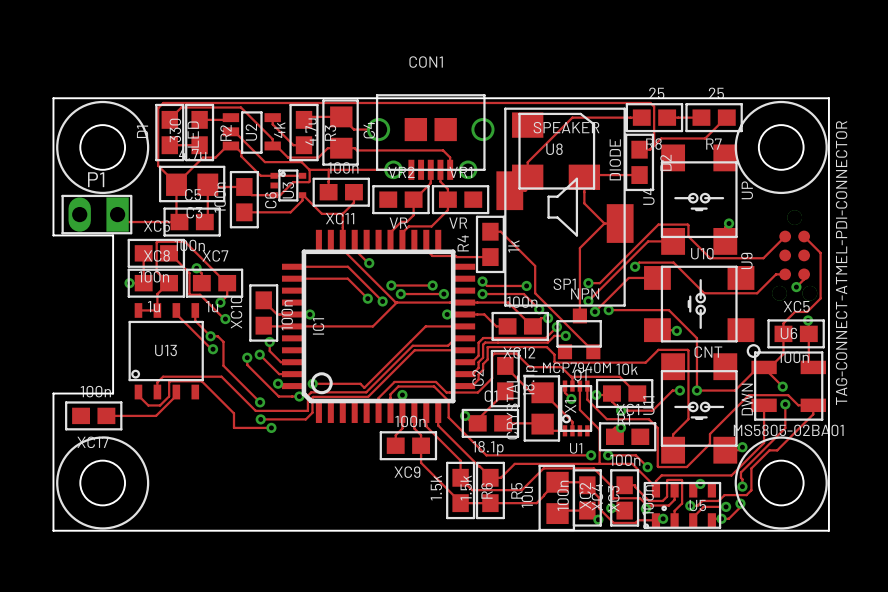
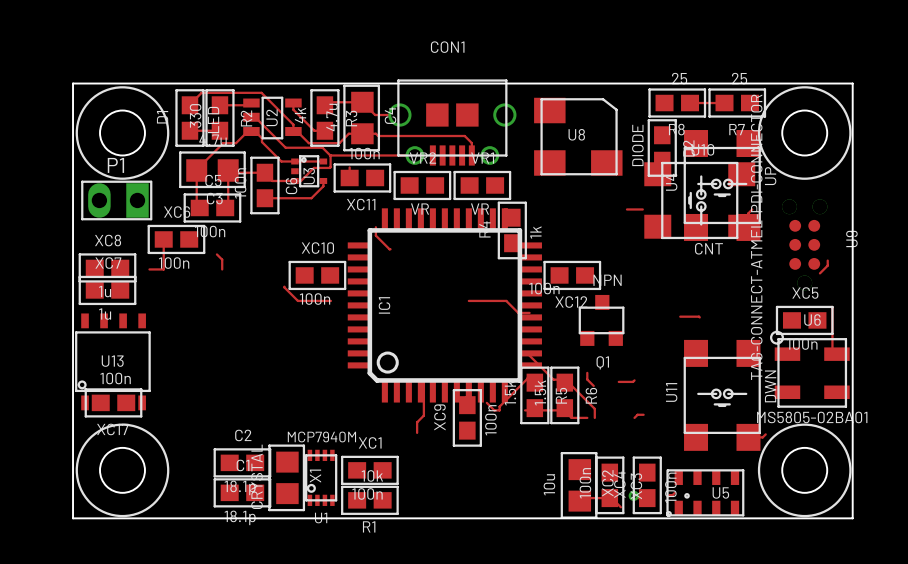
track: (641, 117) (572, 117) (527, 162) (527, 188) (525, 190) (509, 190) -> none
track: (726, 117) (705, 138) (661, 138) (650, 149) (639, 149) -> none
track: (654, 145) (654, 106) (650, 102) (163, 102) (158, 108) (158, 165) (176, 184) -> none
track: (328, 169) (328, 181) -> none
track: (430, 169) (430, 183) (413, 199) (413, 215) (406, 221) (401, 221) (390, 232) (390, 241) -> none
track: (440, 169) (440, 181) (447, 189) (447, 210) (431, 226) (408, 226) (402, 232) (402, 241) -> none
track: (639, 175) (586, 175) (584, 177) (584, 203) (604, 223) (579, 248) (579, 315) -> none
track: (353, 192) (353, 202) (342, 213) -> none
track: (302, 195) (321, 213) (342, 213) -> none
SP1: SPEAKER (564, 207) -> none
track: (342, 213) (342, 249) (395, 302) (508, 302) (532, 326) (541, 318) (548, 318) -> none
track: (117, 214) (125, 222) (179, 222) -> none
via: (729, 223) -> none
track: (490, 232) (500, 231) (535, 265) (535, 293) (593, 351) -> none
board edge: (53, 235) (113, 235) (113, 393) (53, 393) -> (73, 221) (73, 380)
track: (785, 236) (763, 258) (710, 258) (688, 236) (687, 224) (658, 224) (599, 283) (588, 283) -> none
track: (804, 236) (820, 252) (820, 298) (807, 311) (794, 311) (783, 323) (783, 354) (770, 367) (758, 367) (735, 390) (696, 390) (696, 338) (668, 310) (608, 310) -> none
track: (426, 241) (426, 249) (432, 255) (490, 257) -> none
track: (673, 241) (648, 241) (588, 301) -> none
track: (169, 253) (189, 273) (189, 294) (200, 294) (225, 319) -> none
U9 rotation: 0° (794, 255) -> 180° (804, 244)
via: (369, 263) -> none
track: (293, 266) (347, 266) (382, 301) -> none
track: (635, 266) (639, 262) (673, 262) (704, 293) (757, 293) (776, 274) (785, 274) -> none
via: (635, 266) -> none
via: (196, 268) -> none
track: (657, 277) (628, 277) (594, 311) -> none
track: (293, 278) (347, 278) (367, 298) -> none
track: (482, 281) (486, 285) (526, 285) -> none
via: (482, 281) -> none
via: (129, 283) -> none
XC8 position: (156, 283) -> (107, 267)
track: (168, 283) (156, 271) (156, 242) (185, 241) (227, 283) (227, 295) (220, 302) -> none
track: (168, 283) (157, 294) (157, 310) (138, 310) -> none
XC7 position: (214, 283) -> (107, 290)
via: (588, 283) -> none
track: (391, 285) (432, 285) -> none
via: (391, 285) -> none
via: (432, 285) -> none
via: (526, 285) -> none
via: (796, 287) -> none
track: (400, 294) (443, 294) -> none
via: (400, 294) -> none
via: (443, 294) -> none
track: (482, 294) (523, 294) (539, 309) -> none
via: (482, 294) -> none
via: (367, 298) -> none
via: (382, 301) -> none
via: (588, 301) -> none
via: (220, 302) -> none
track: (396, 302) (372, 326) (263, 325) -> none
U10 position: (699, 304) -> (699, 200)
via: (539, 309) -> none
track: (176, 310) (176, 314) (213, 349) -> none
track: (195, 310) (195, 320) (210, 336) (217, 336) (223, 341) (223, 365) (260, 402) -> none
via: (608, 310) -> none
via: (594, 311) -> none
XC10 rotation: 0° (263, 313) -> 90° clockwise (317, 275)
XC10 position: (263, 313) -> (317, 275)
via: (309, 314) -> none
via: (447, 314) -> none
via: (548, 318) -> none
via: (225, 319) -> none
via: (808, 320) -> none
IC1 position: (378, 326) -> (444, 305)
track: (463, 326) (425, 326) (364, 387) (360, 383) (312, 383) -> none
XC12 position: (520, 326) -> (572, 275)
track: (556, 327) (545, 338) (483, 338) (478, 342) (478, 355) (472, 362) (463, 362) -> none
via: (556, 327) -> none
via: (676, 330) -> none
XC5 position: (796, 333) -> (804, 320)
track: (565, 335) (554, 335) (547, 342) (498, 342) -> none
via: (565, 335) -> none
via: (210, 336) -> none
track: (463, 338) (455, 338) (448, 345) (412, 345) (366, 392) (311, 392) (307, 395) (307, 410) (255, 410) (221, 376) (163, 376) (157, 382) (157, 392) -> none
track: (269, 342) (269, 351) (280, 362) (293, 362) -> none
via: (269, 342) -> none
track: (497, 342) (485, 342) (483, 344) (483, 357) (478, 362) (478, 367) (472, 374) (463, 374) -> none
via: (213, 349) -> none
track: (463, 350) (414, 350) (368, 396) (313, 396) (312, 412) (305, 419) (260, 419) -> none
U13 position: (166, 351) -> (112, 361)
track: (259, 354) (279, 374) (293, 374) -> none
via: (259, 354) -> none
track: (247, 357) (247, 364) (278, 396) (299, 396) -> none
via: (247, 357) -> none
track: (764, 367) (782, 386) -> none
track: (571, 376) (619, 376) (637, 393) -> none
C2 rotation: 0° (505, 378) -> 90° clockwise (242, 462)
C2 position: (505, 378) -> (242, 462)
via: (278, 383) -> none
via: (312, 383) -> none
track: (463, 386) (472, 386) (478, 379) (478, 374) (483, 369) (483, 364) (487, 359) (487, 347) (546, 347) (554, 354) (555, 362) (645, 362) (658, 349) (687, 349) (688, 419) (673, 434) (673, 450) -> none
track: (572, 386) (572, 378) (561, 367) (529, 367) (516, 353) (494, 353) (492, 355) (492, 378) (477, 392) (446, 392) (435, 381) (394, 381) (378, 398) (378, 411) -> none
track: (579, 386) (579, 409) (599, 429) (599, 463) -> none
track: (587, 386) (587, 399) (606, 419) (648, 419) (657, 427) (658, 467) (686, 467) (709, 443) (709, 434) (748, 395) (788, 395) (798, 405) (813, 405) (813, 414) (777, 450) (769, 450) (751, 468) (751, 490) (746, 495) (724, 495) (718, 500) (702, 500) (697, 505) (690, 505) -> none
via: (782, 386) -> none
track: (679, 390) (672, 390) (652, 410) (621, 410) (611, 400) -> none
via: (679, 390) -> none
via: (696, 390) -> none
track: (138, 392) (138, 395) (148, 405) (160, 405) (169, 396) (169, 381) (201, 381) (234, 413) (234, 427) (271, 427) -> none
track: (176, 392) (176, 395) (156, 415) (106, 415) -> none
R1 position: (624, 393) -> (369, 500)
via: (402, 395) -> none
via: (596, 395) -> none
via: (299, 396) -> none
via: (571, 399) -> none
via: (260, 402) -> none
track: (426, 403) (426, 426) (460, 460) (460, 478) (472, 490) (521, 490) (543, 468) (593, 468) (613, 487) (613, 498) (639, 498) (647, 505) (668, 505) (674, 499) (674, 490) -> none
track: (785, 404) (785, 428) (740, 472) (742, 486) -> none
via: (785, 404) -> none
track: (764, 405) (764, 442) (731, 475) (661, 475) (655, 481) (655, 490) -> none
X1 position: (541, 408) -> (286, 477)
U1 position: (576, 408) -> (321, 477)
via: (621, 410) -> none
track: (390, 411) (390, 394) (398, 386) (434, 386) (448, 401) (448, 417) (486, 455) (591, 455) -> none
track: (414, 411) (414, 428) (421, 435) (421, 462) (460, 503) (536, 503) (556, 482) (584, 482) (598, 497) (598, 508) (613, 522) (635, 522) (638, 520) (663, 518) -> none
track: (438, 411) (438, 425) (490, 477) (500, 477) (514, 463) (632, 463) (655, 487) -> none
via: (465, 415) -> none
via: (260, 419) -> none
C1 position: (490, 423) -> (242, 492)
via: (271, 427) -> none
via: (620, 427) -> none
XC1 position: (627, 436) -> (369, 470)
XC9 rotation: 0° (408, 445) -> 90° clockwise (467, 417)
XC9 position: (408, 445) -> (467, 417)
via: (742, 447) -> none
via: (591, 455) -> none
track: (608, 455) (635, 455) (647, 467) -> none
via: (608, 455) -> none
via: (647, 467) -> none
via: (700, 483) -> none
track: (624, 485) (635, 485) (649, 500) (662, 500) (667, 496) (667, 480) (681, 479) (682, 503) (674, 510) (674, 520) -> none
via: (742, 486) -> none
R6 position: (460, 490) -> (564, 395)
R5 position: (490, 490) -> (534, 395)
track: (740, 503) (740, 507) (728, 518) (711, 520) -> none
via: (740, 503) -> none
via: (690, 505) -> none
track: (726, 506) (703, 506) (693, 517) (693, 520) -> none
via: (726, 506) -> none
via: (645, 508) -> none
via: (663, 518) -> none
via: (721, 518) -> none
via: (598, 519) -> none

